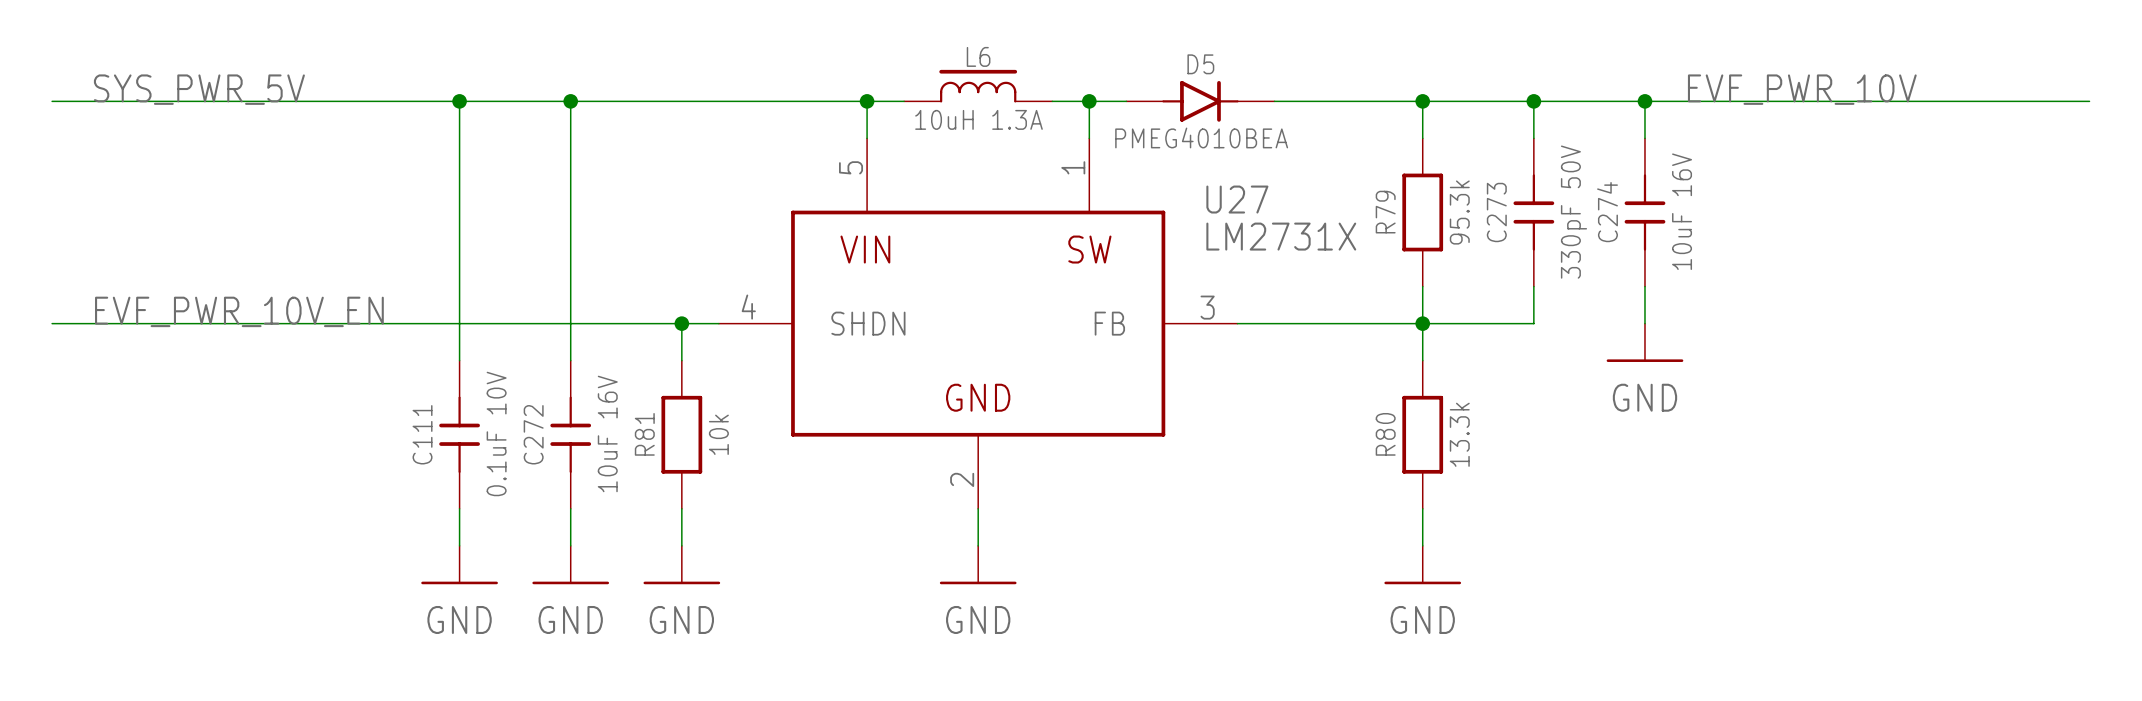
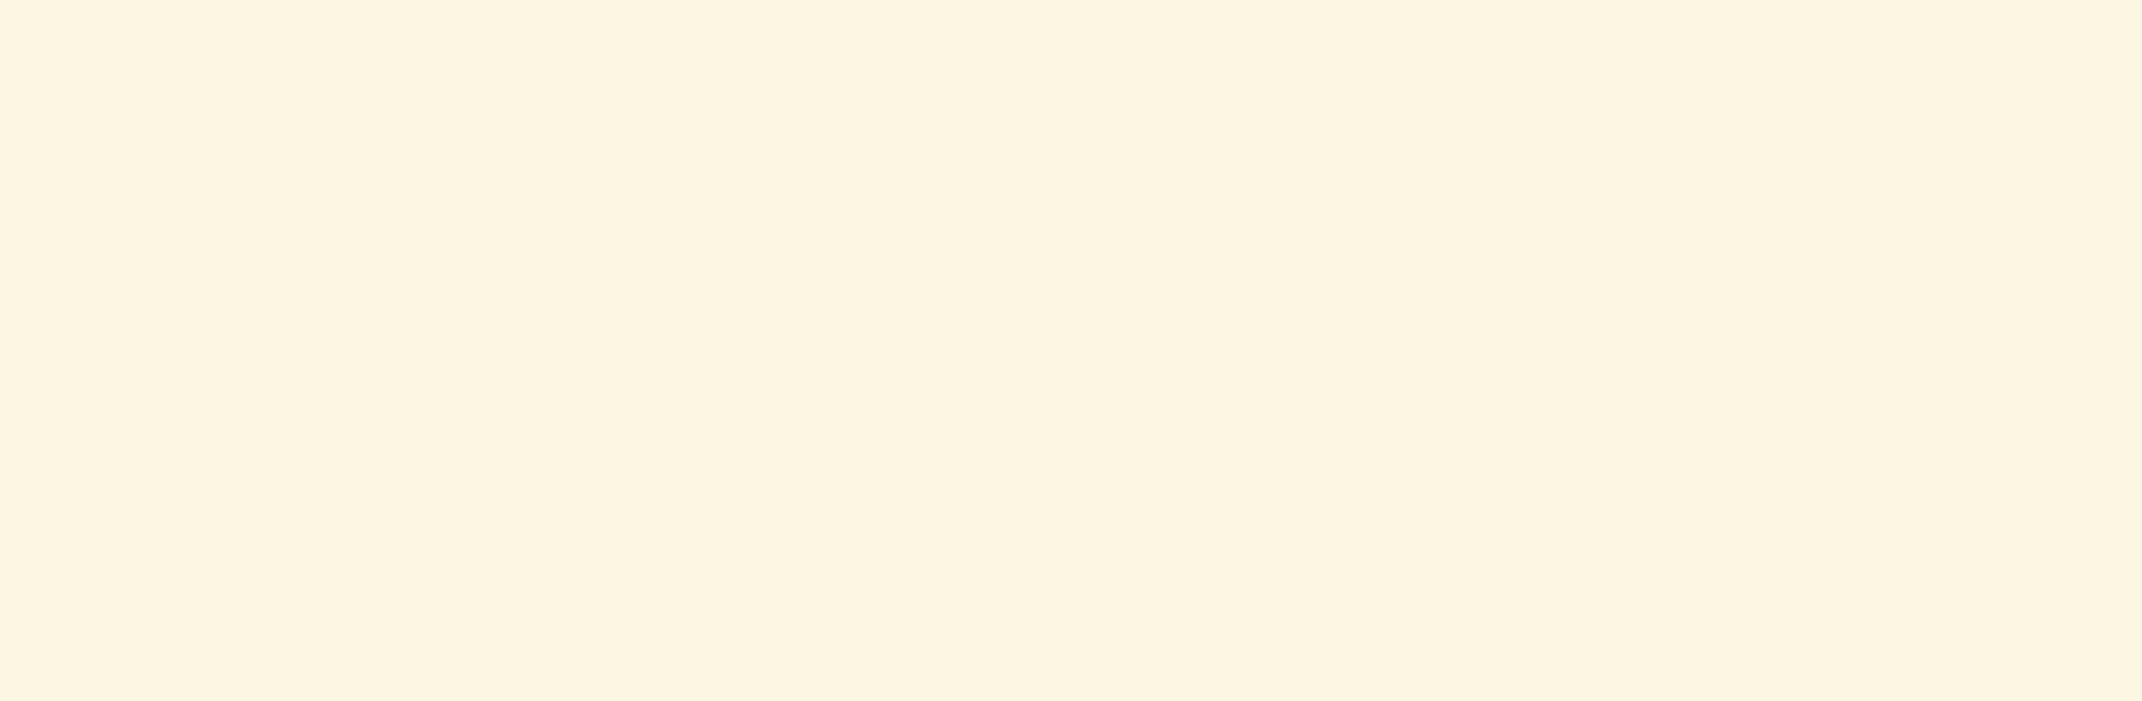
L6: 10uH 1.3A (978, 86) -> none
label: SYS_PWR_5V (199, 89) -> none
label: EVF_PWR_10V (1802, 89) -> none
wire: (52, 101) (904, 101) -> none
wire: (459, 101) (459, 360) -> none
junction: (459, 101) -> none
wire: (570, 101) (570, 360) -> none
junction: (570, 101) -> none
wire: (867, 101) (867, 138) -> none
junction: (867, 101) -> none
wire: (1052, 101) (1126, 101) -> none
wire: (1089, 101) (1089, 138) -> none
junction: (1089, 101) -> none
D5: PMEG4010BEA (1200, 101) -> none
wire: (1274, 101) (2089, 101) -> none
wire: (1422, 101) (1422, 138) -> none
junction: (1422, 101) -> none
wire: (1533, 101) (1533, 138) -> none
junction: (1533, 101) -> none
wire: (1644, 101) (1644, 138) -> none
junction: (1644, 101) -> none
R79: 95.3k (1422, 212) -> none
C273: 330pF 50V (1533, 212) -> none
C274: 10uF 16V (1644, 212) -> none
wire: (1422, 286) (1422, 360) -> none
wire: (1533, 286) (1533, 323) (1237, 323) -> none
wire: (1644, 286) (1644, 323) -> none
label: EVF_PWR_10V_EN (239, 311) -> none
wire: (52, 323) (718, 323) -> none
wire: (681, 323) (681, 360) -> none
junction: (681, 323) -> none
U27: LM2731X (978, 323) -> none
junction: (1422, 323) -> none
power symbol: GND (1644, 342) -> none
C111: 0.1uF 10V (459, 434) -> none
C272: 10uF 16V (570, 434) -> none
R81: 10k (681, 434) -> none
R80: 13.3k (1422, 434) -> none
wire: (459, 508) (459, 545) -> none
wire: (570, 508) (570, 545) -> none
wire: (681, 508) (681, 545) -> none
wire: (978, 508) (978, 545) -> none
wire: (1422, 508) (1422, 545) -> none
power symbol: GND (459, 565) -> none
power symbol: GND (570, 565) -> none
power symbol: GND (681, 565) -> none
power symbol: GND (978, 565) -> none
power symbol: GND (1422, 565) -> none

